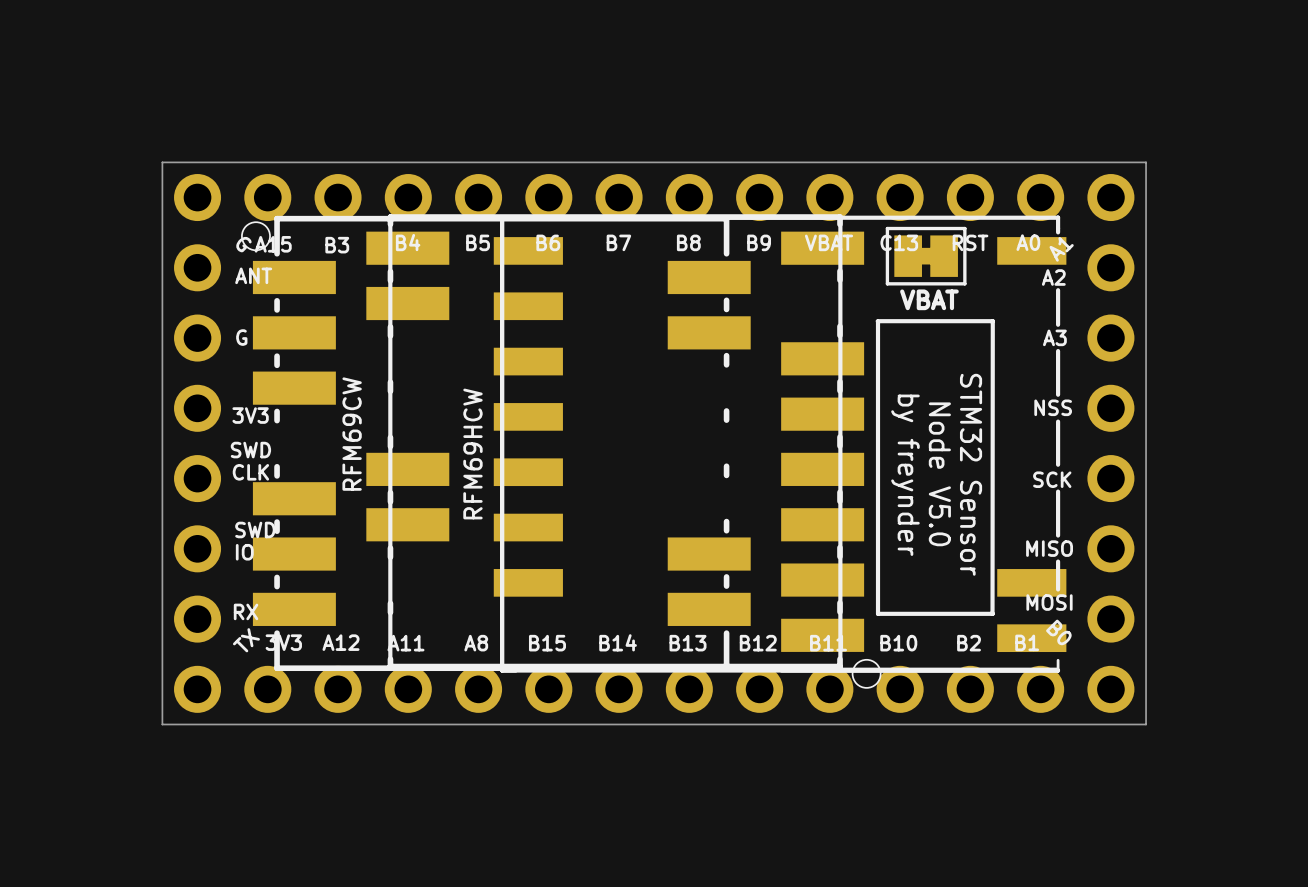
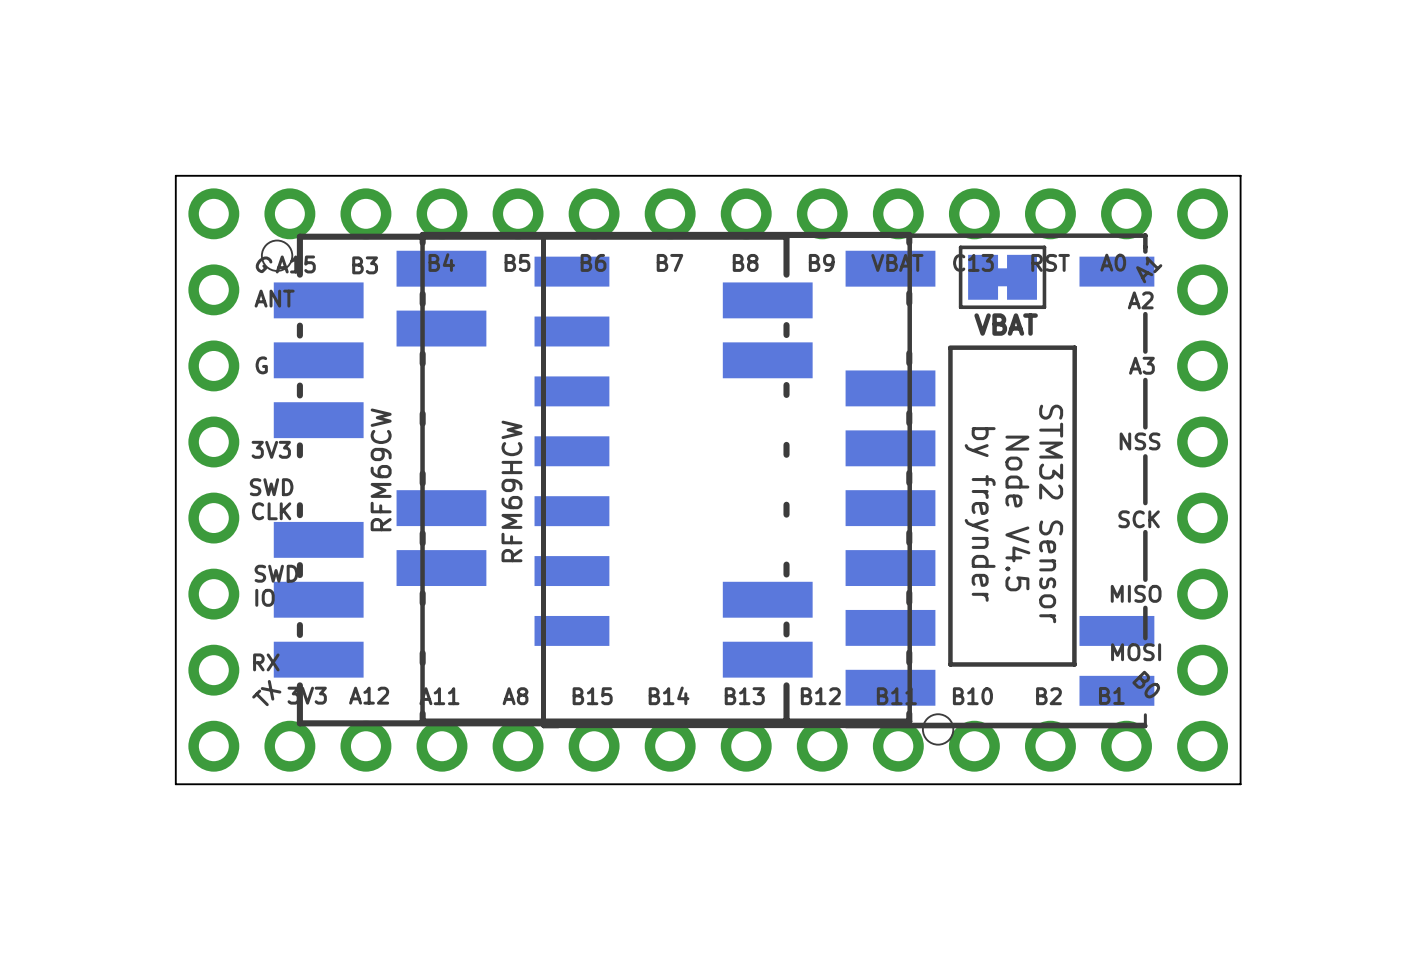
text: Node V5.0 (939, 474) -> Node V4.5 (1017, 513)

